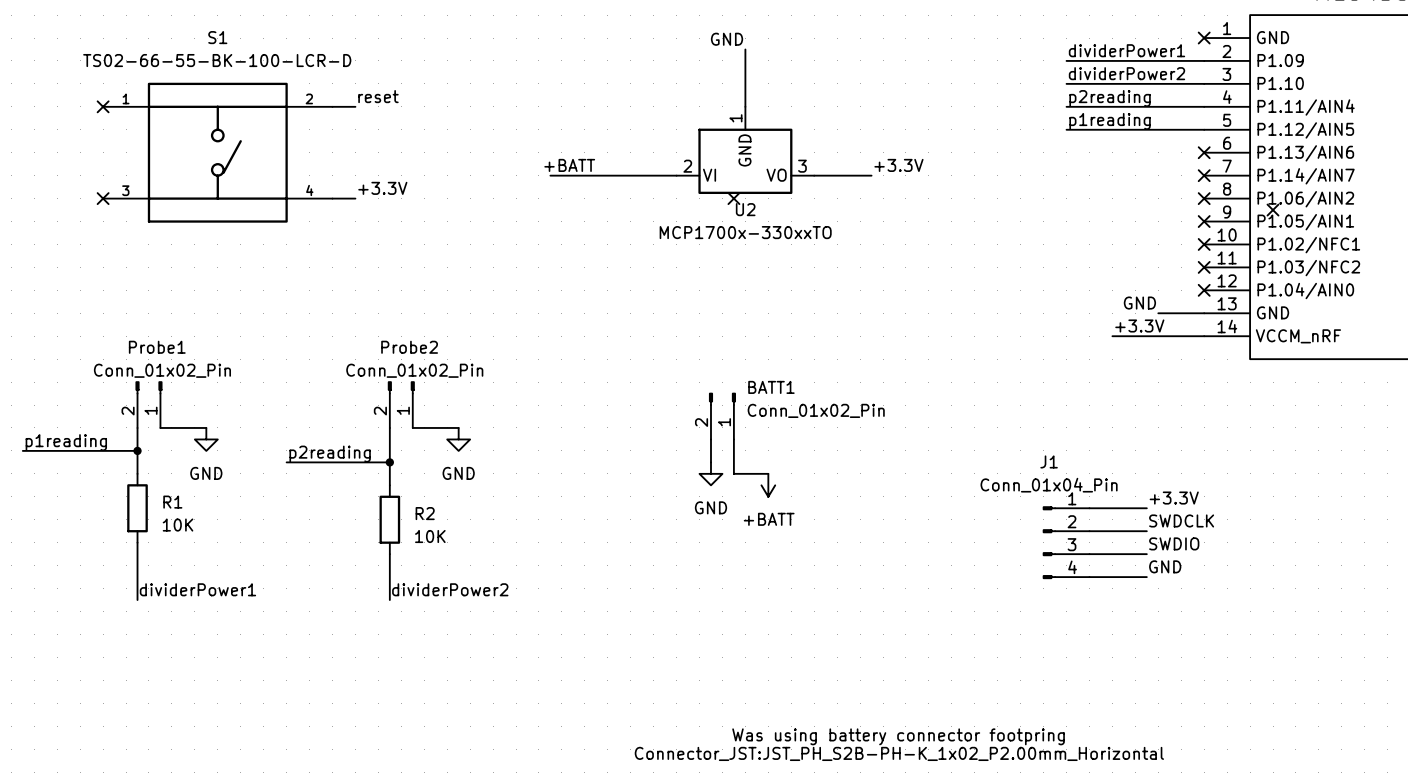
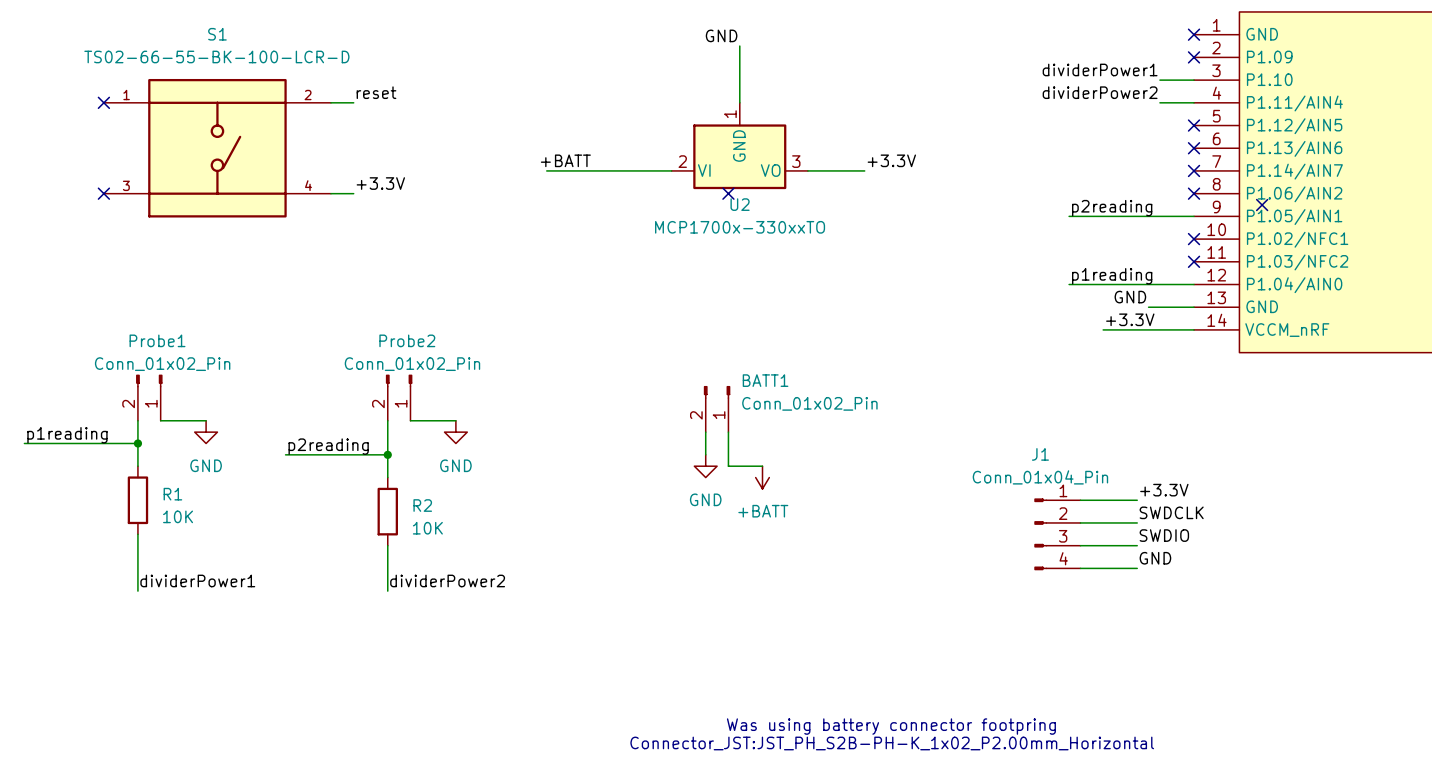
label position: dividerPower1 (1126, 50) -> dividerPower1 (1100, 69)
wire: (1066, 60) (1204, 60) -> none
no-connect mark: none -> (1194, 57)
label position: dividerPower2 (1126, 73) -> dividerPower2 (1100, 92)
wire: (1066, 83) (1169, 83) -> none
label position: p2reading (1110, 98) -> p2reading (1112, 208)
wire: (1066, 106) (1169, 106) -> none
label position: p1reading (1110, 121) -> p1reading (1112, 276)
wire: (1066, 129) (1204, 129) -> none
no-connect mark: none -> (1194, 125)
wire: none -> (1069, 216) (1194, 216)
no-connect mark: (1204, 221) -> none
wire: none -> (1069, 284) (1194, 284)
no-connect mark: (1204, 290) -> none

